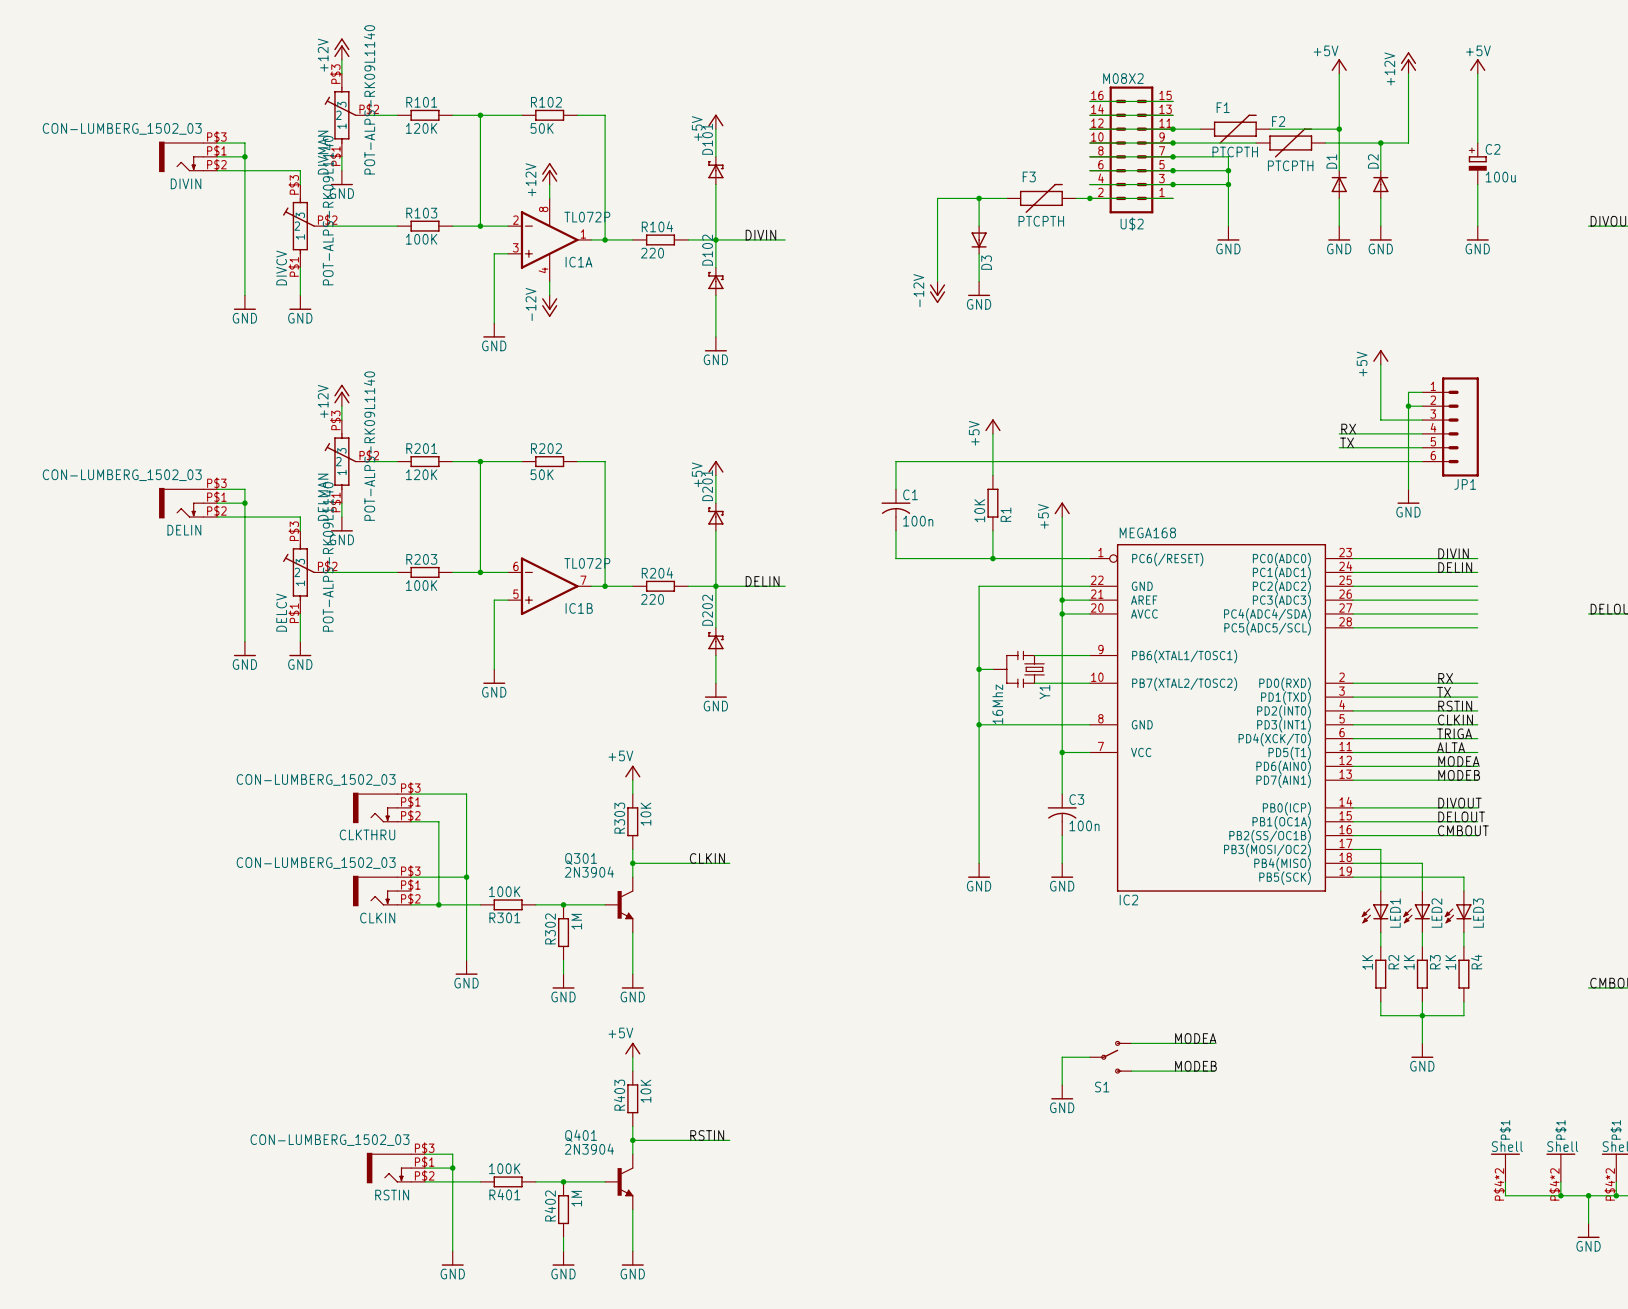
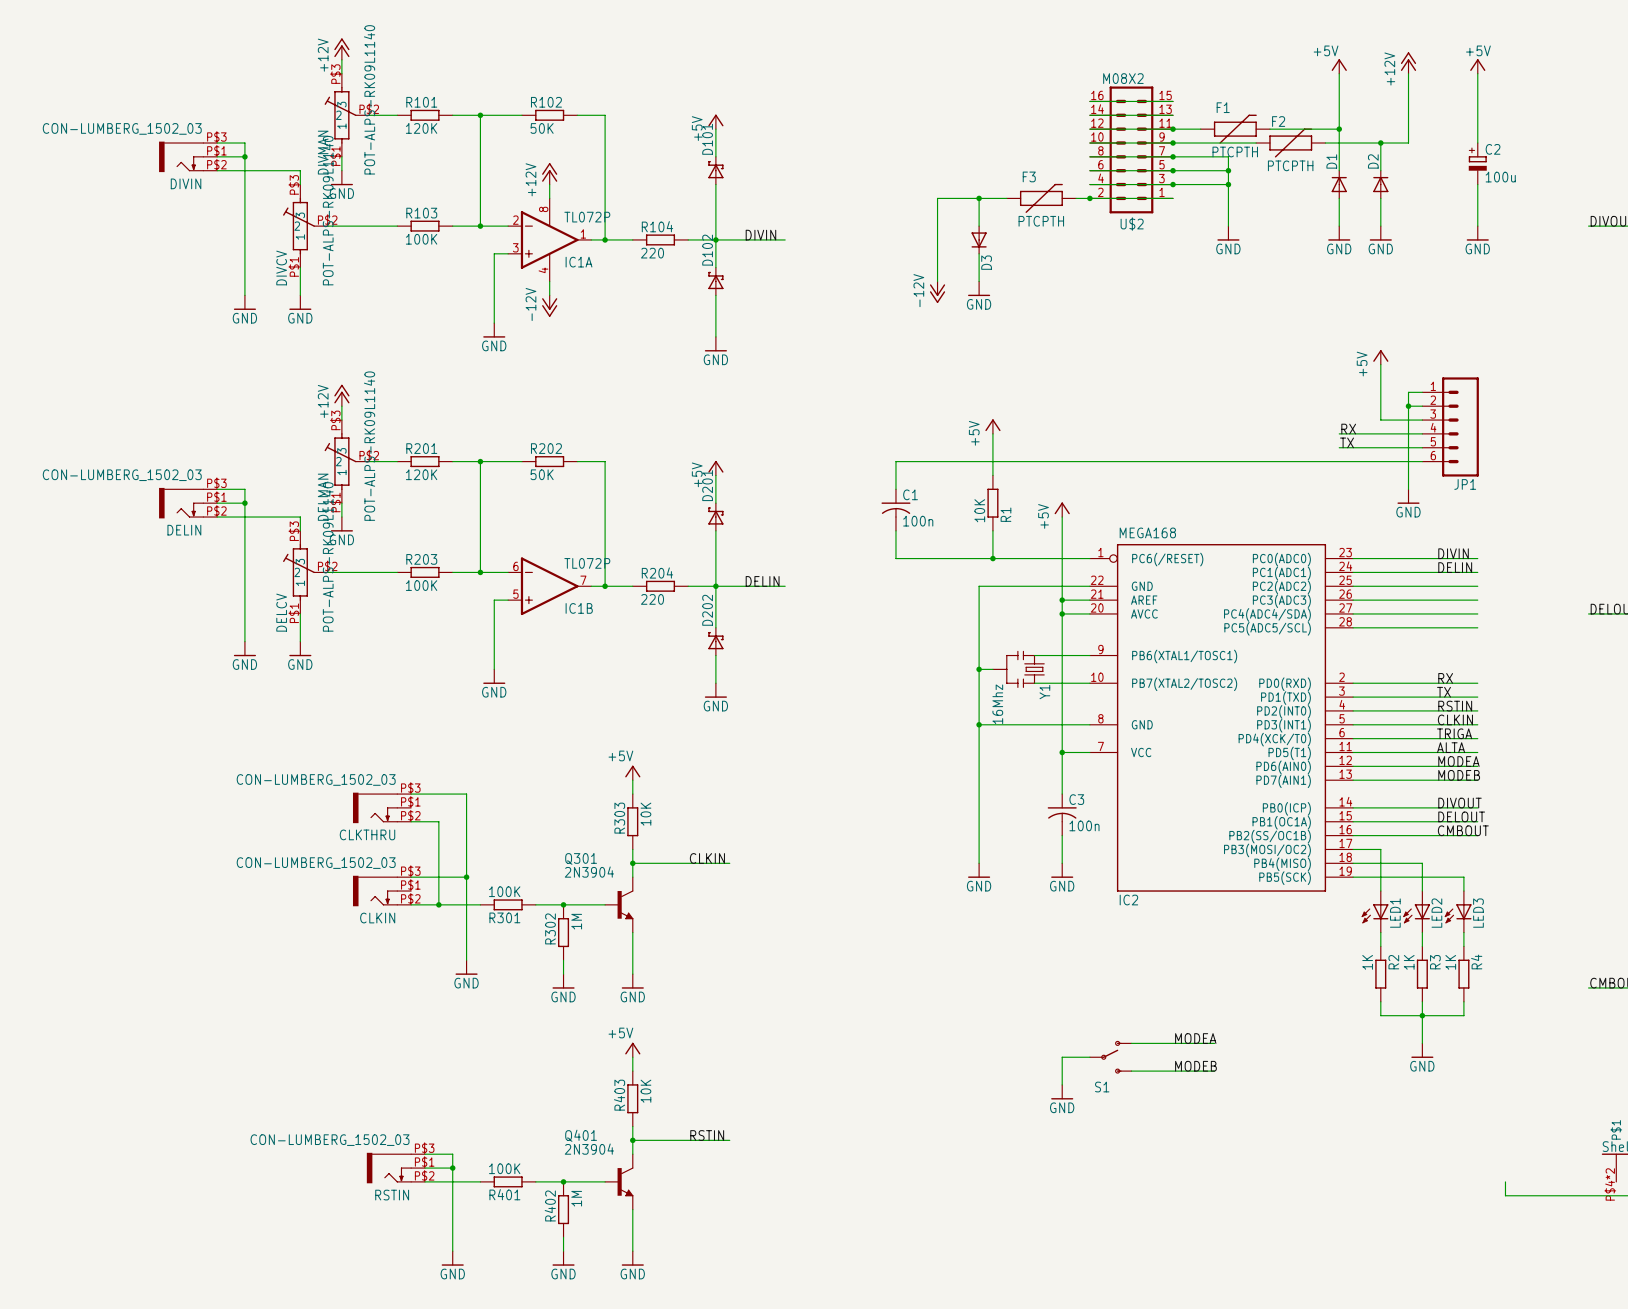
part: (1505, 1167) -> none
part: (1560, 1167) -> none
wire: (1560, 1181) (1560, 1195) -> none
wire: (1616, 1181) (1616, 1195) -> none
junction: (1560, 1195) -> none
wire: (1588, 1195) (1588, 1223) -> none
junction: (1588, 1195) -> none
junction: (1616, 1195) -> none
power symbol: GND (1588, 1230) -> none

